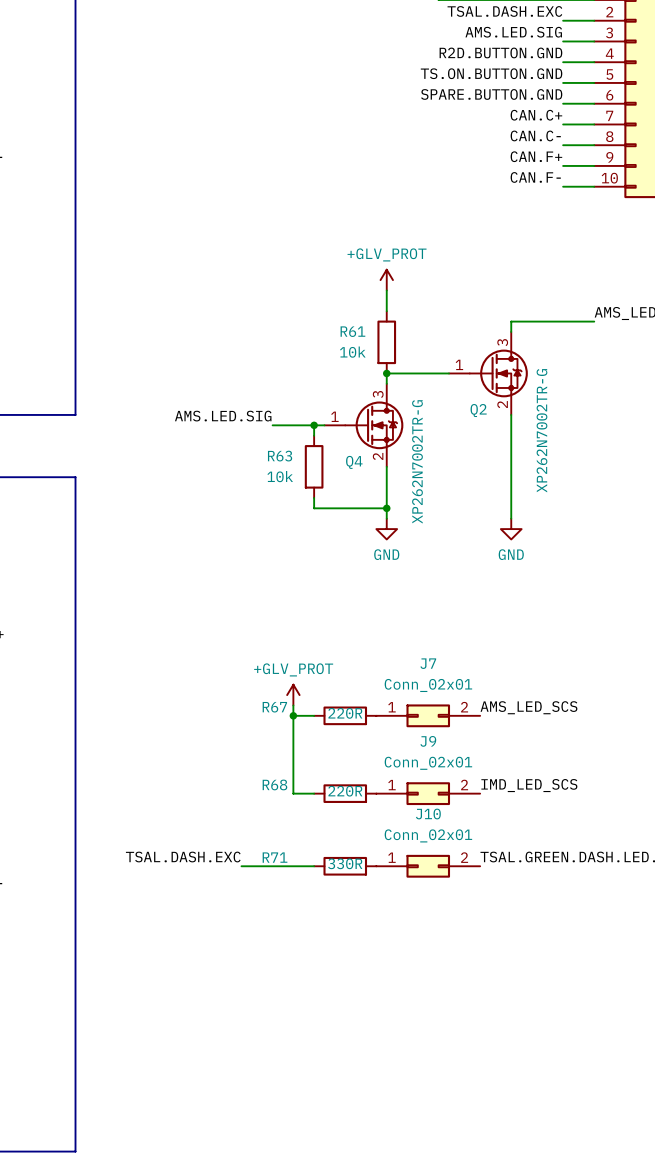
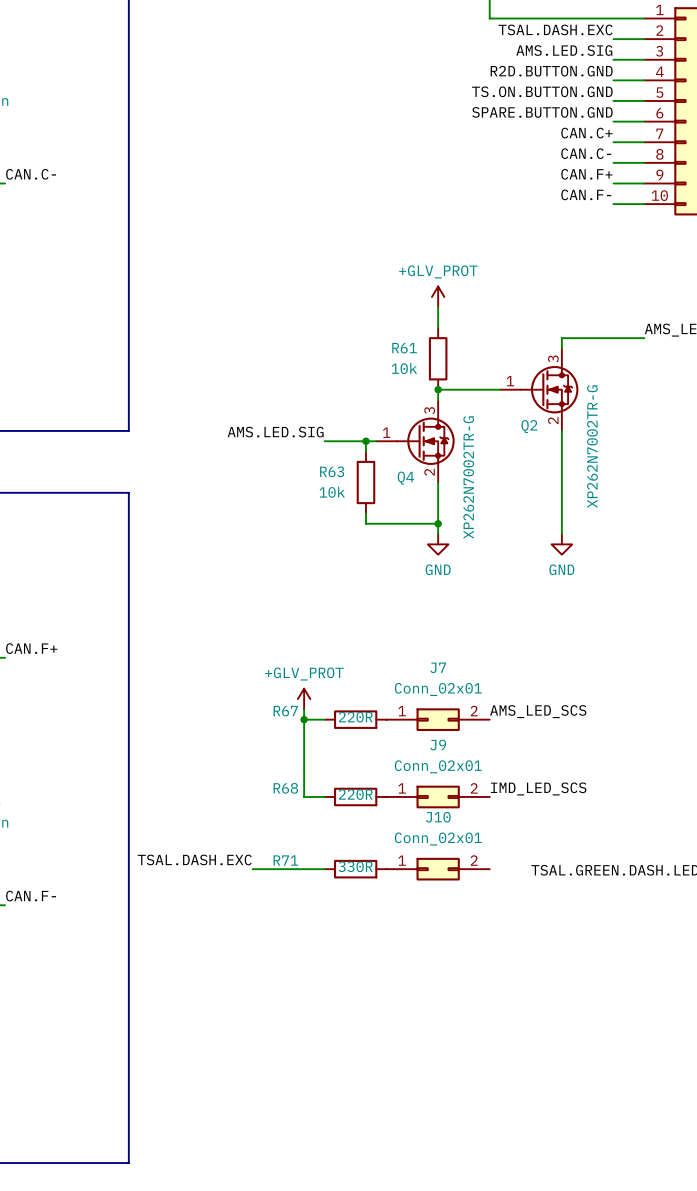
power symbol position: +GLV_PROT (293, 695) -> +GLV_PROT (304, 699)
wire: (293, 705) (293, 793) (314, 793) -> (304, 709) (304, 796) (324, 796)
label position: AMS_LED_SCS (528, 707) -> AMS_LED_SCS (538, 711)
wire: (293, 715) (314, 715) -> (304, 719) (324, 719)
junction position: (293, 715) -> (304, 719)
R67 position: (345, 715) -> (355, 719)
J7 position: (428, 715) -> (438, 719)
label position: IMD_LED_SCS (529, 785) -> IMD_LED_SCS (538, 788)
R68 position: (345, 793) -> (355, 796)
J9 position: (428, 793) -> (438, 796)
label position: TSAL.DASH.EXC (183, 857) -> TSAL.DASH.EXC (194, 859)
wire: (241, 866) (314, 866) -> (252, 869) (324, 869)
R71 position: (345, 866) -> (355, 869)
J10 position: (428, 866) -> (438, 869)

